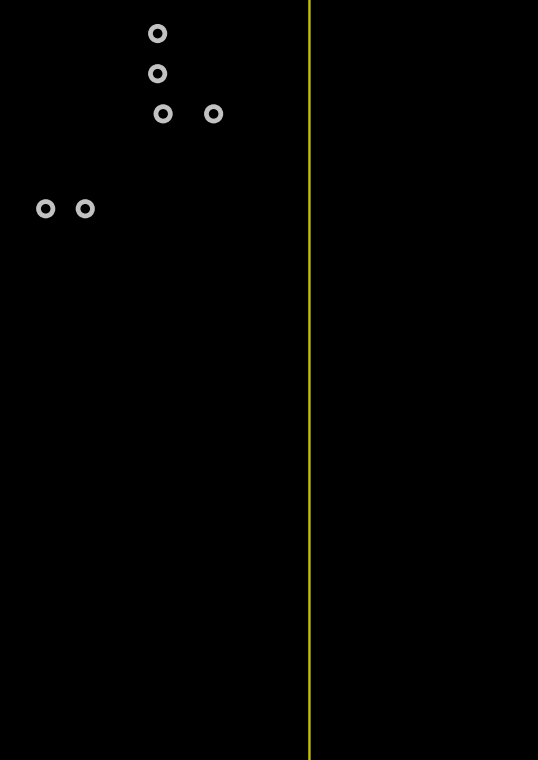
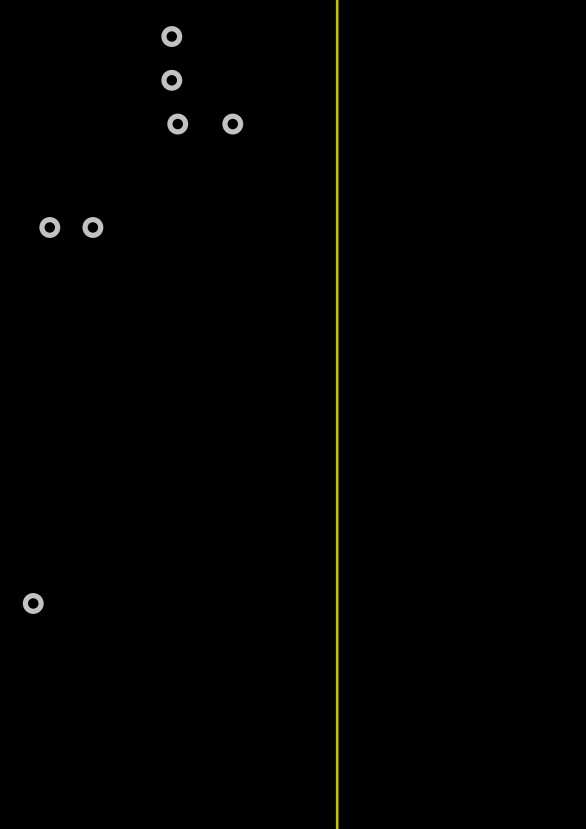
via: none -> (33, 603)

